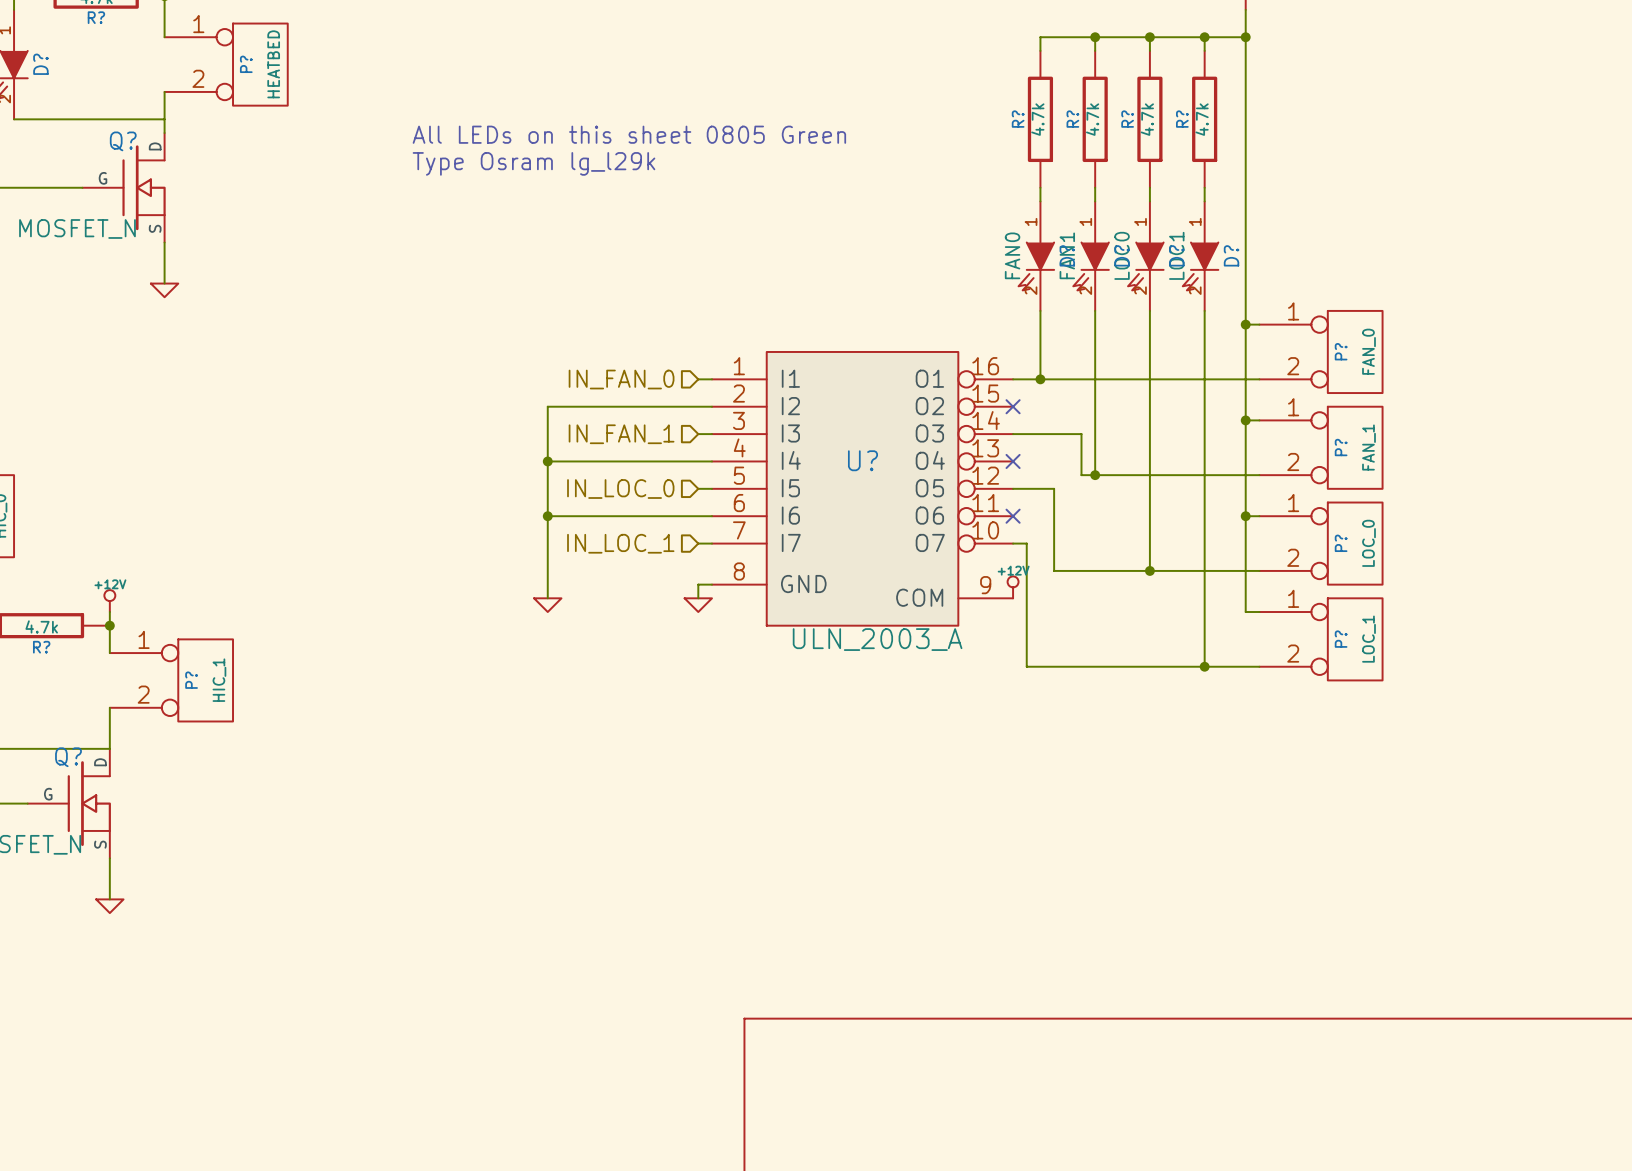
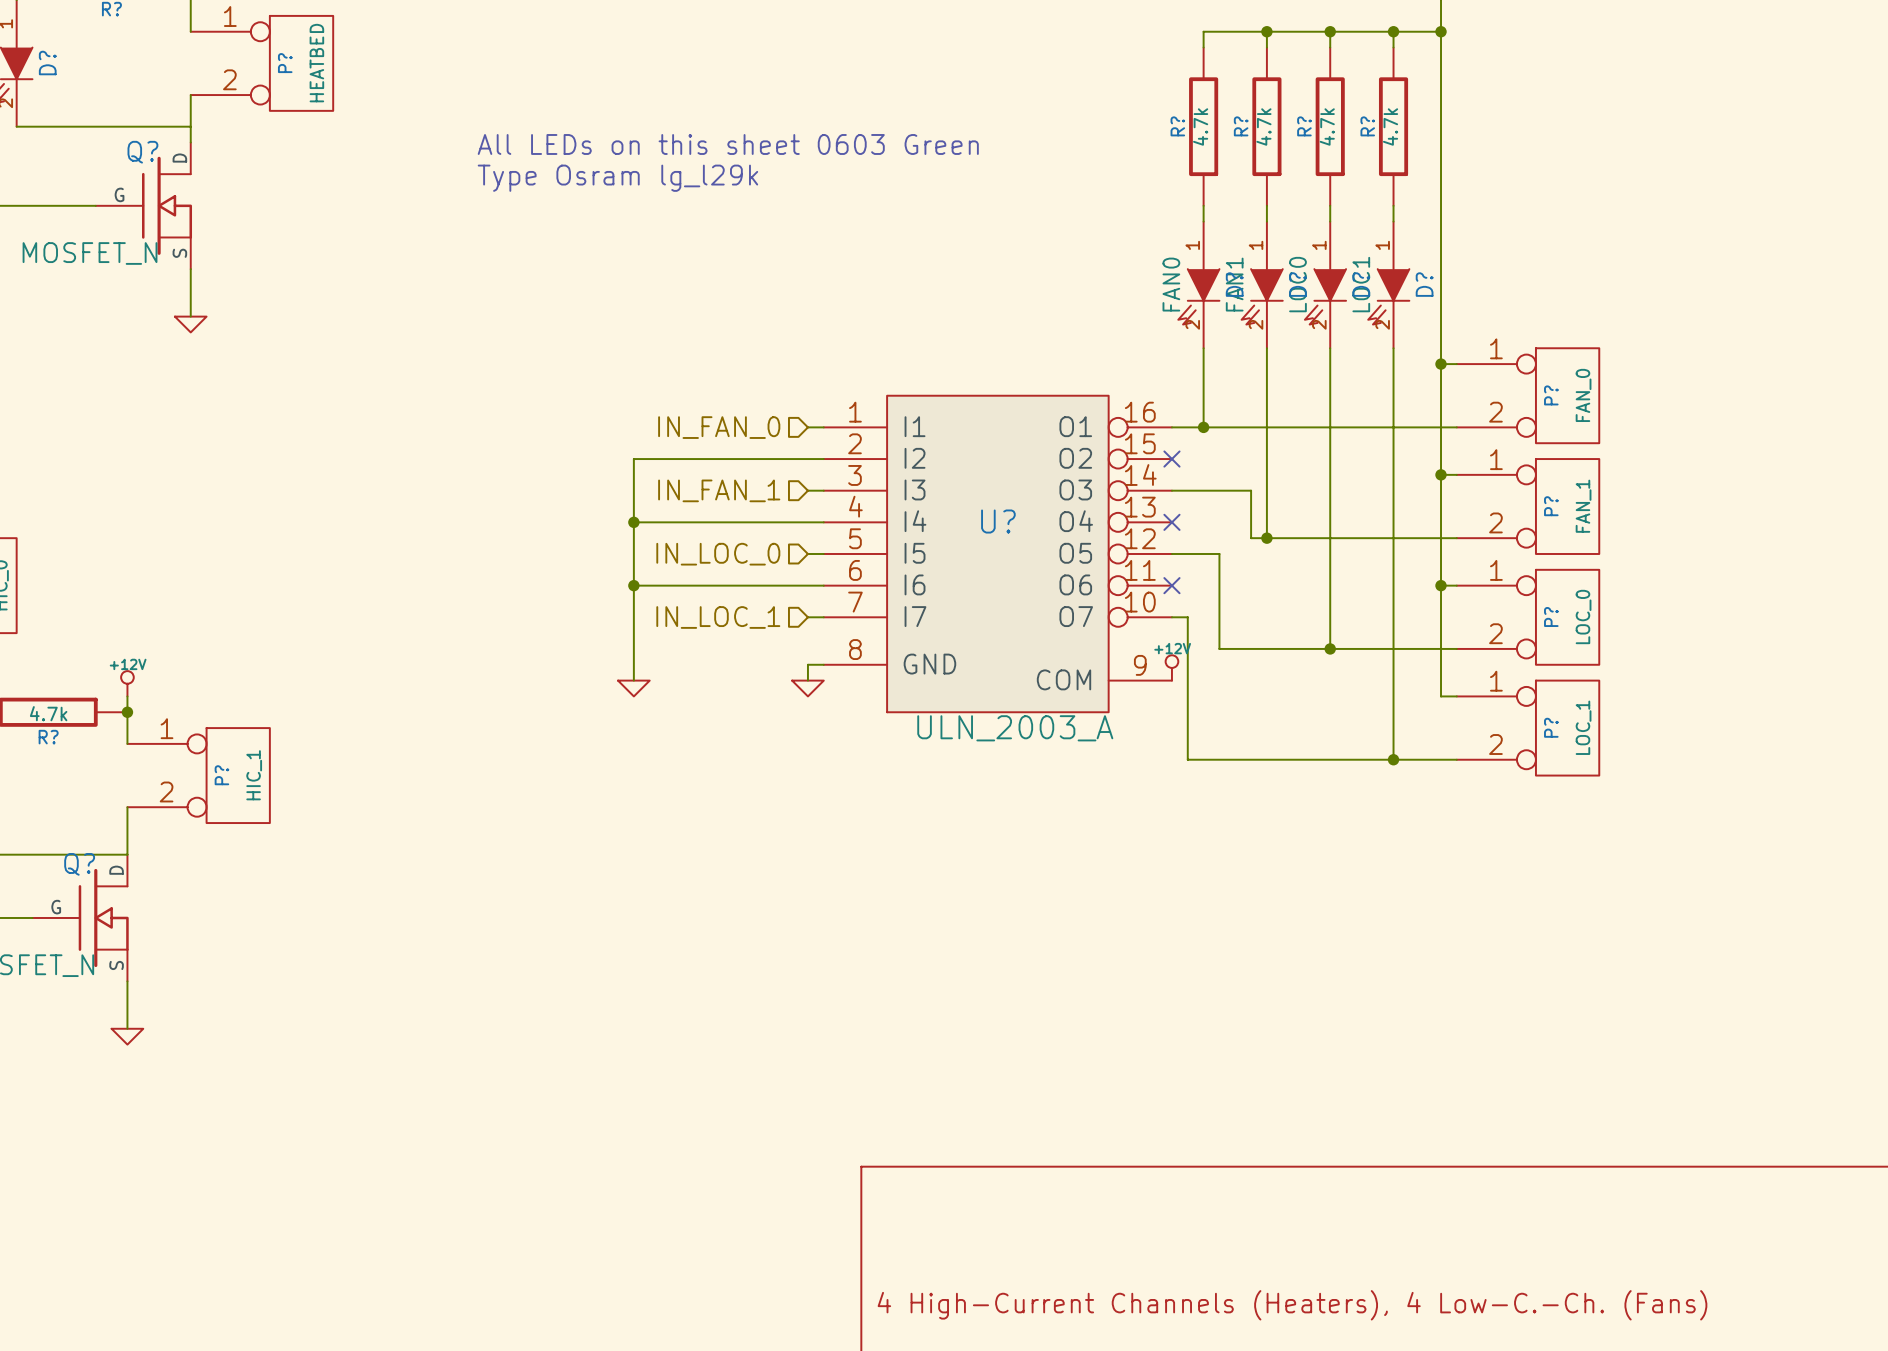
text: All LEDs on this sheet 0805 Green (629, 134) -> All LEDs on this sheet 0603 Green (728, 144)
title block: none -> 4 High-Current Channels (Heaters), 4 Low-C.-Ch. (Fans) (1292, 1305)

